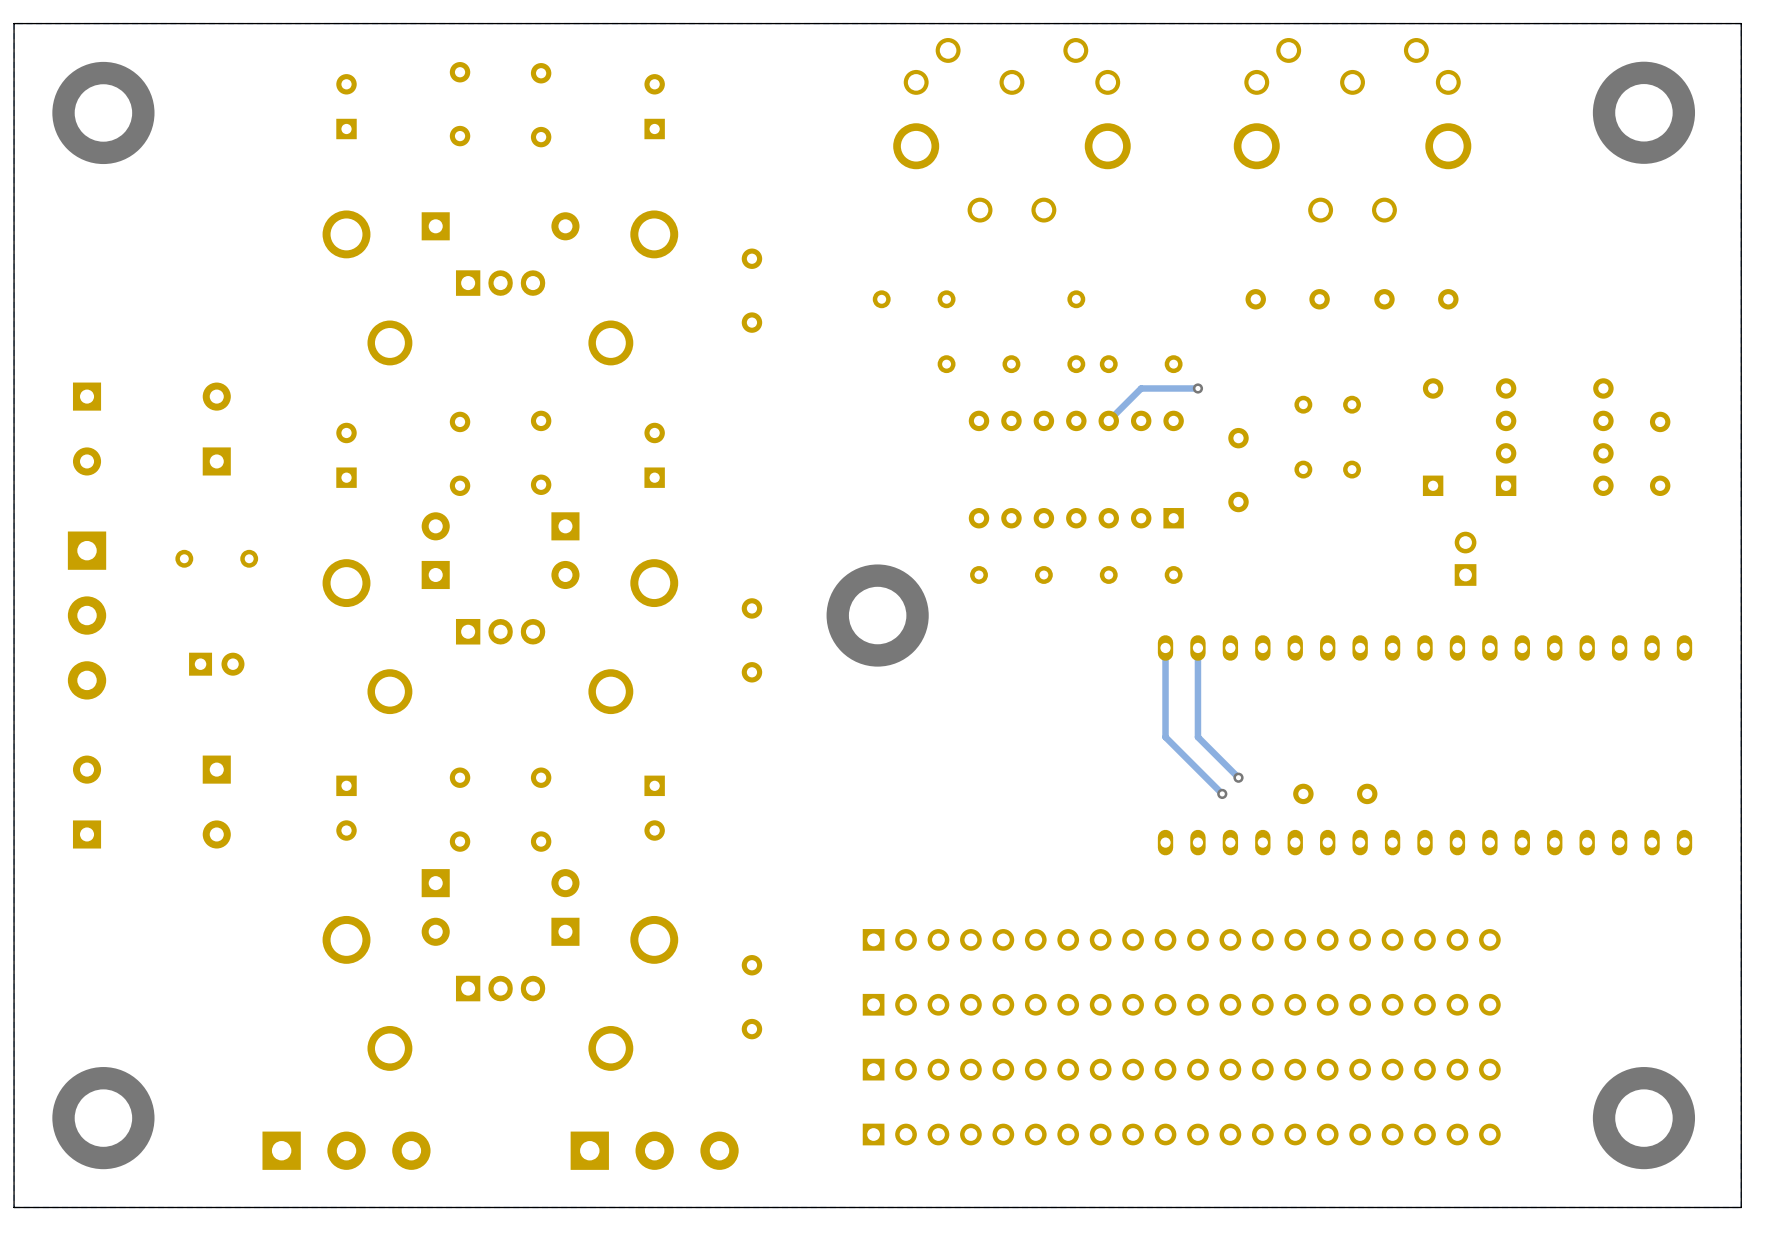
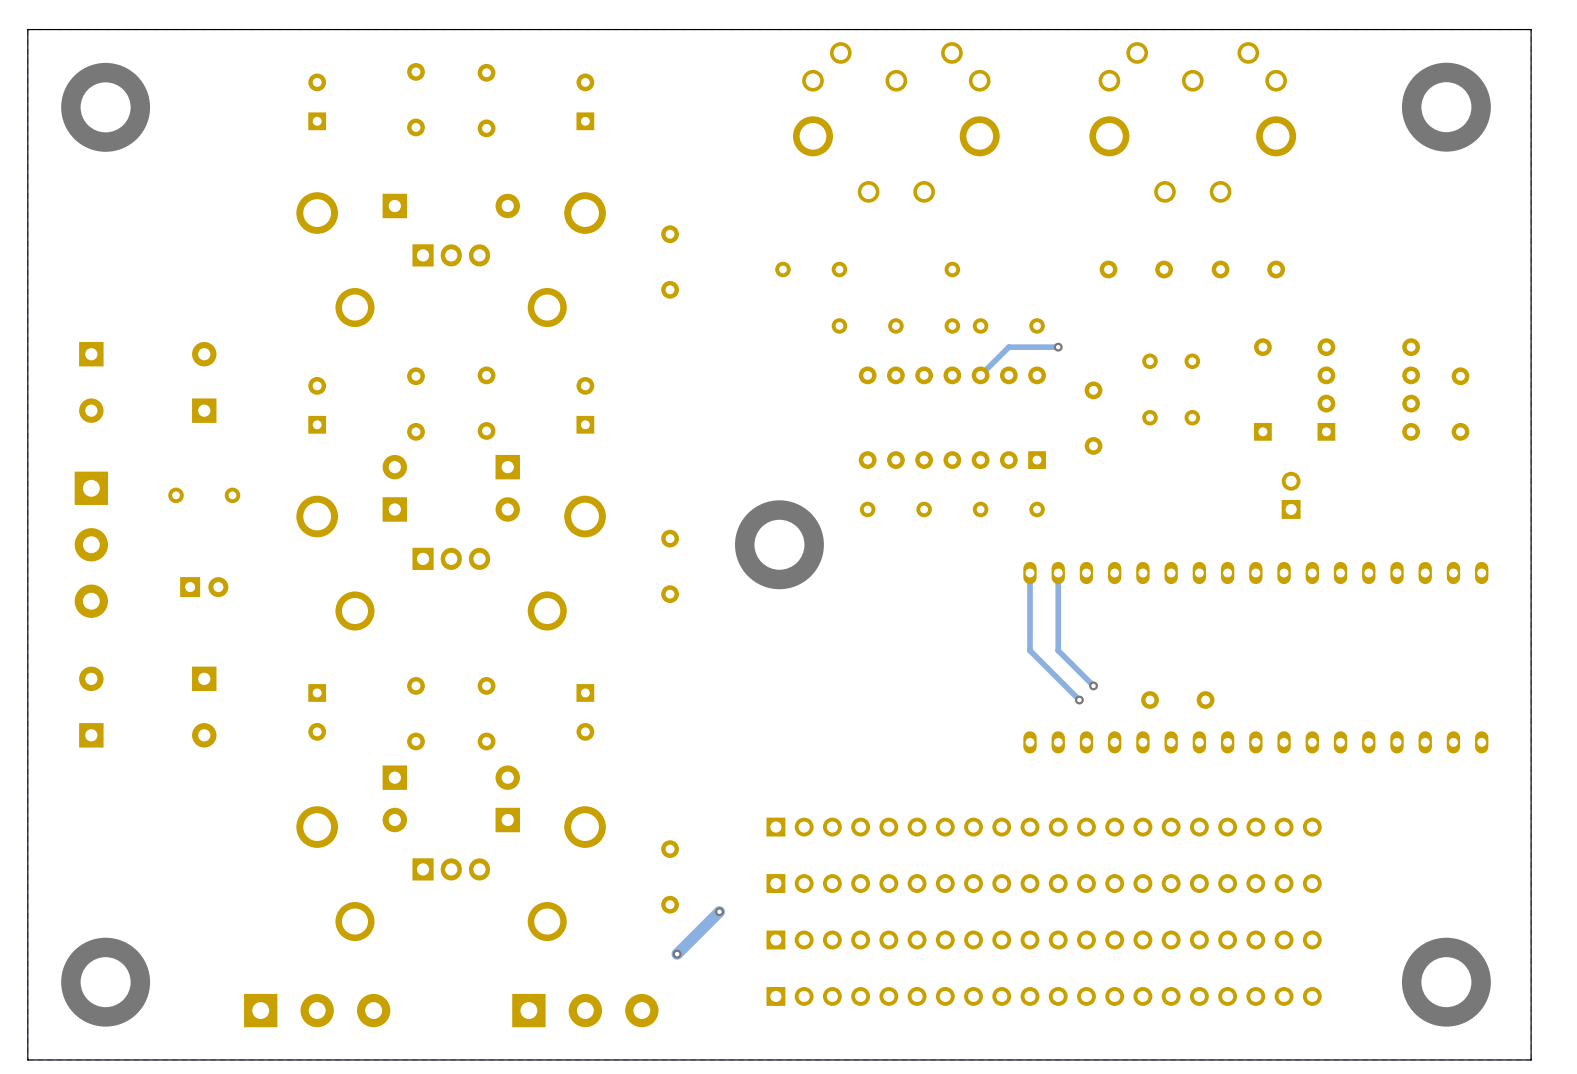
track: none -> (719, 911) (677, 954)
via: none -> (719, 911)
via: none -> (677, 954)

